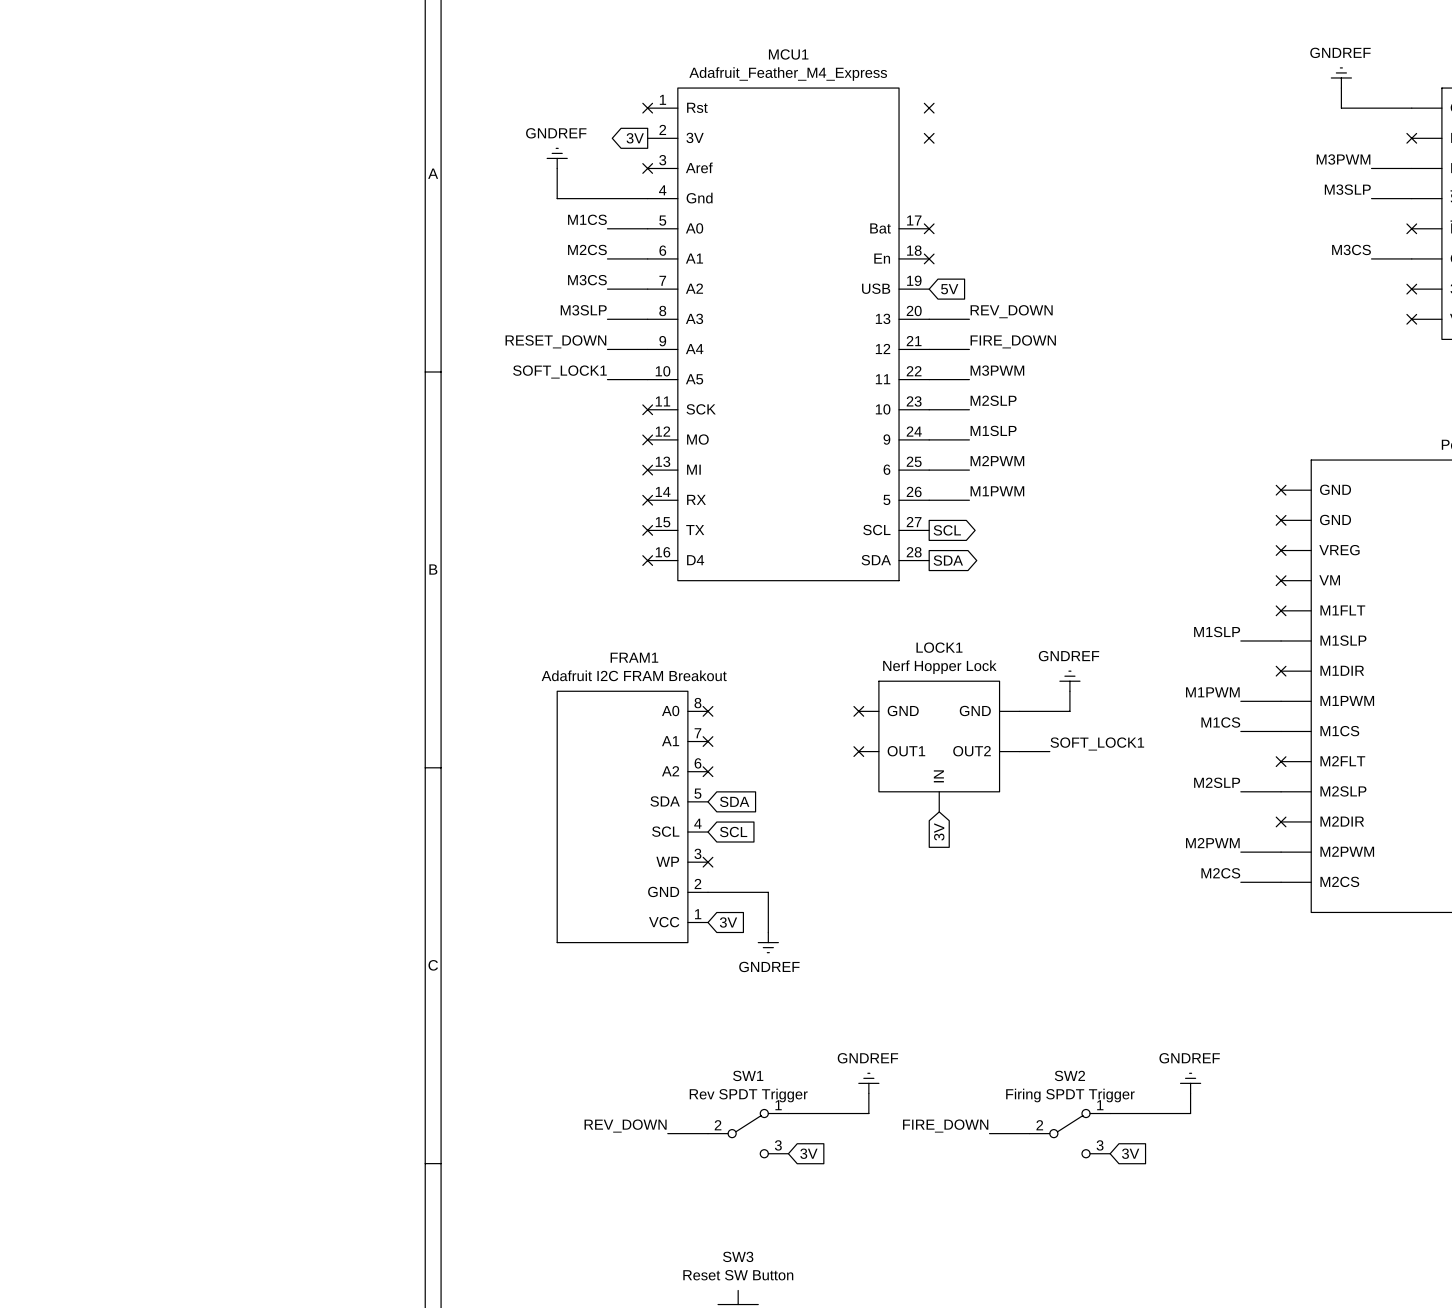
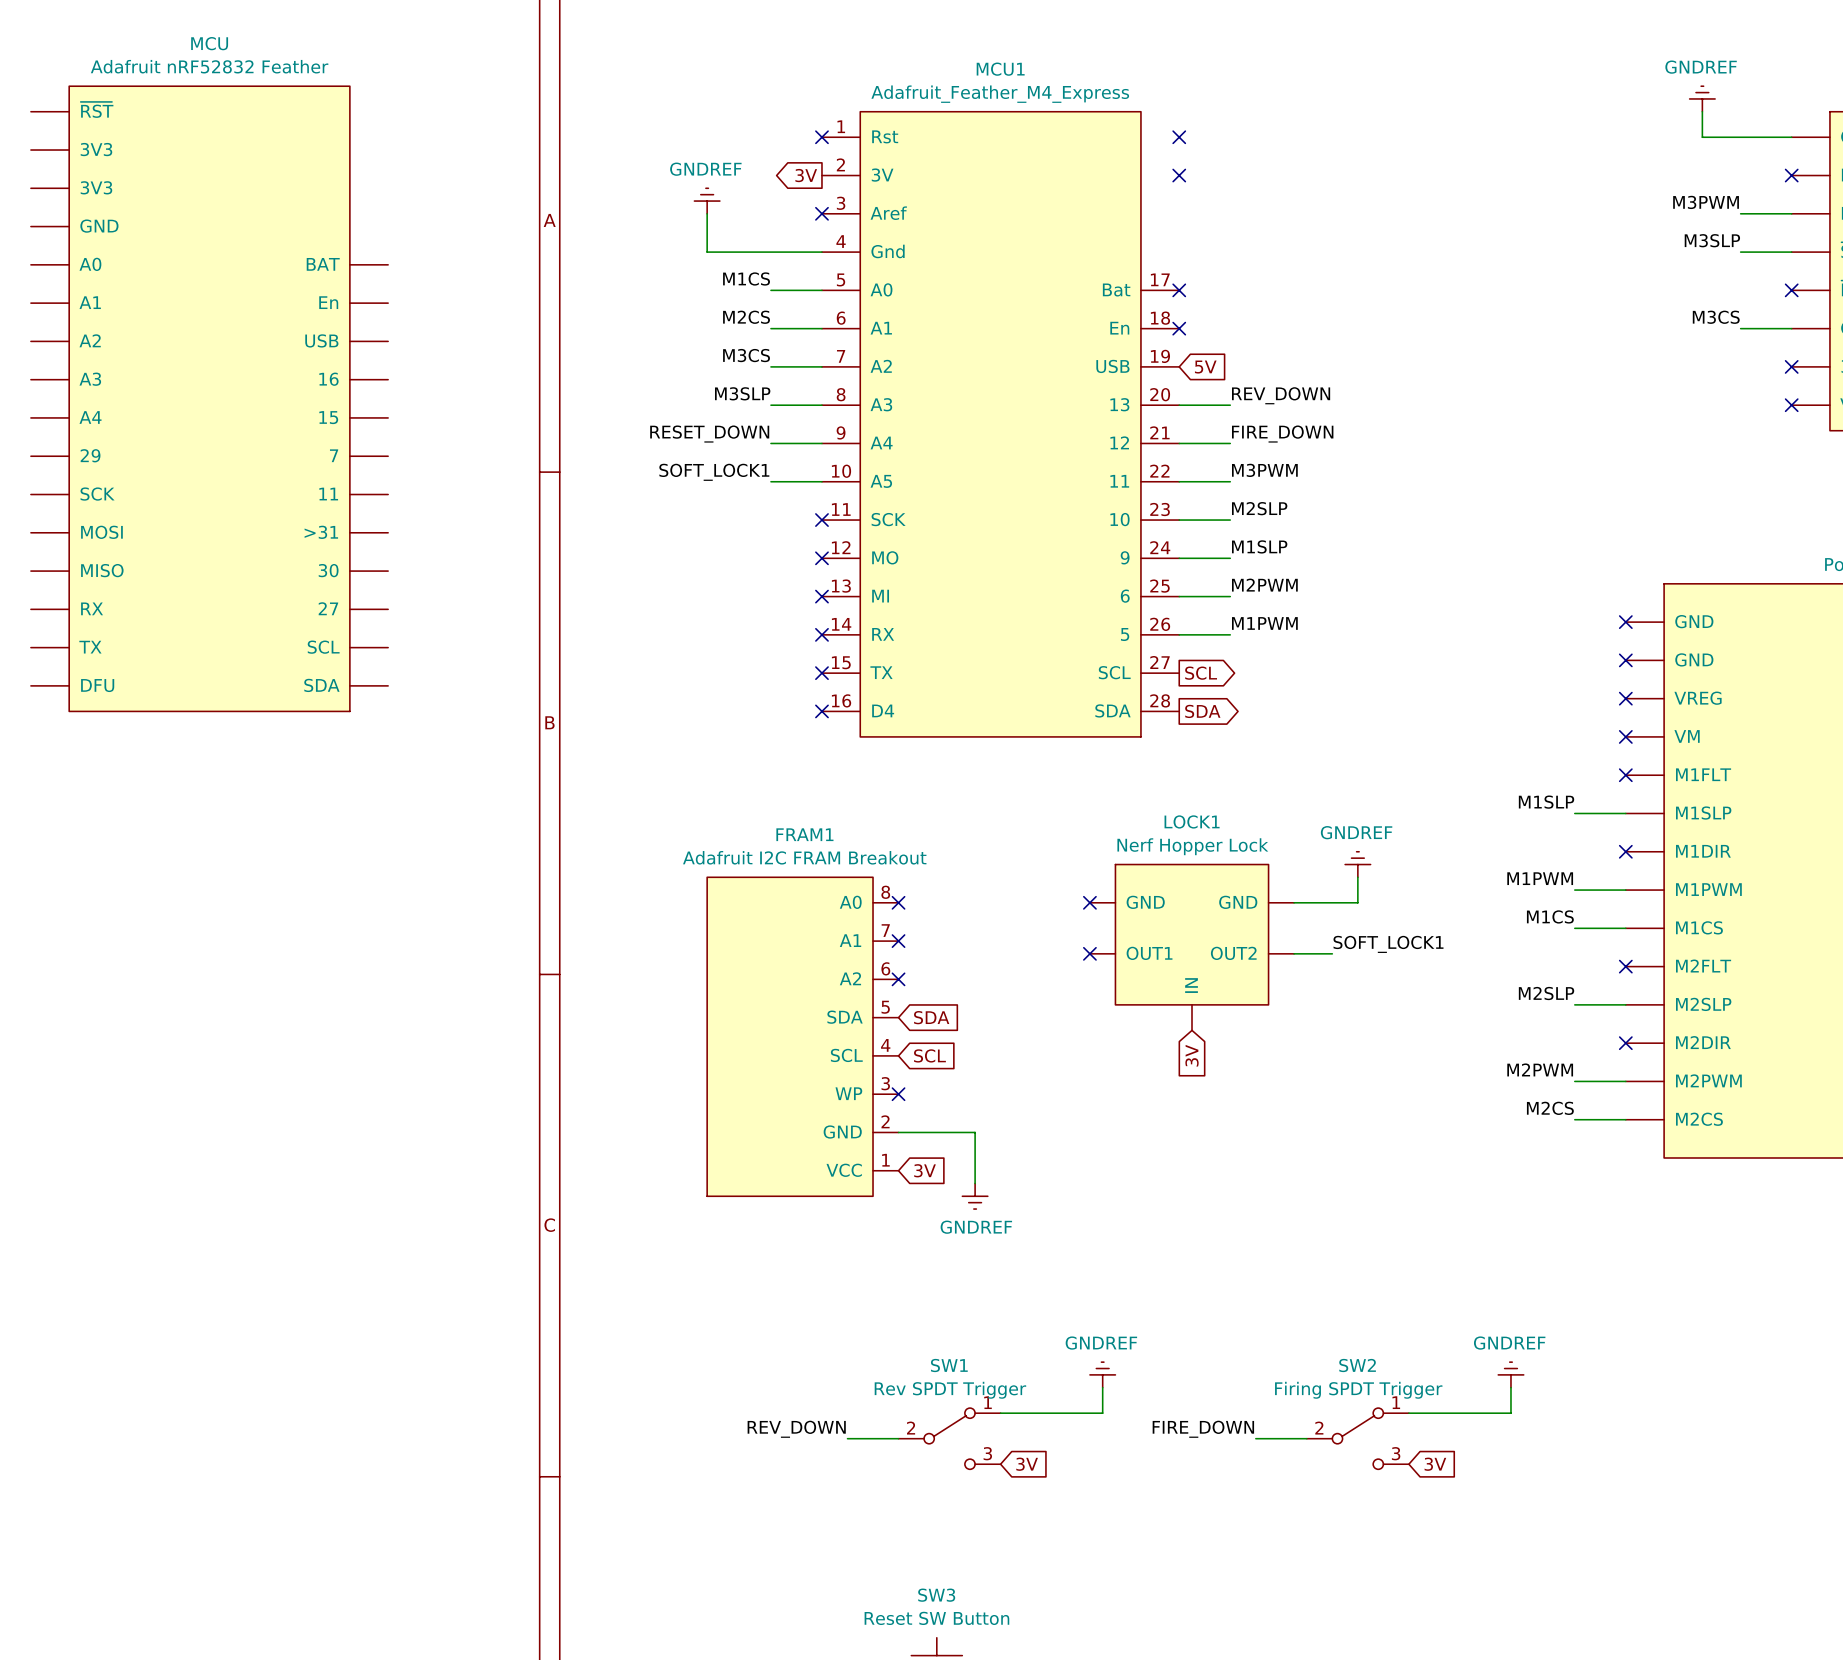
MCU: none -> Adafruit nRF52832 Feather (209, 398)

